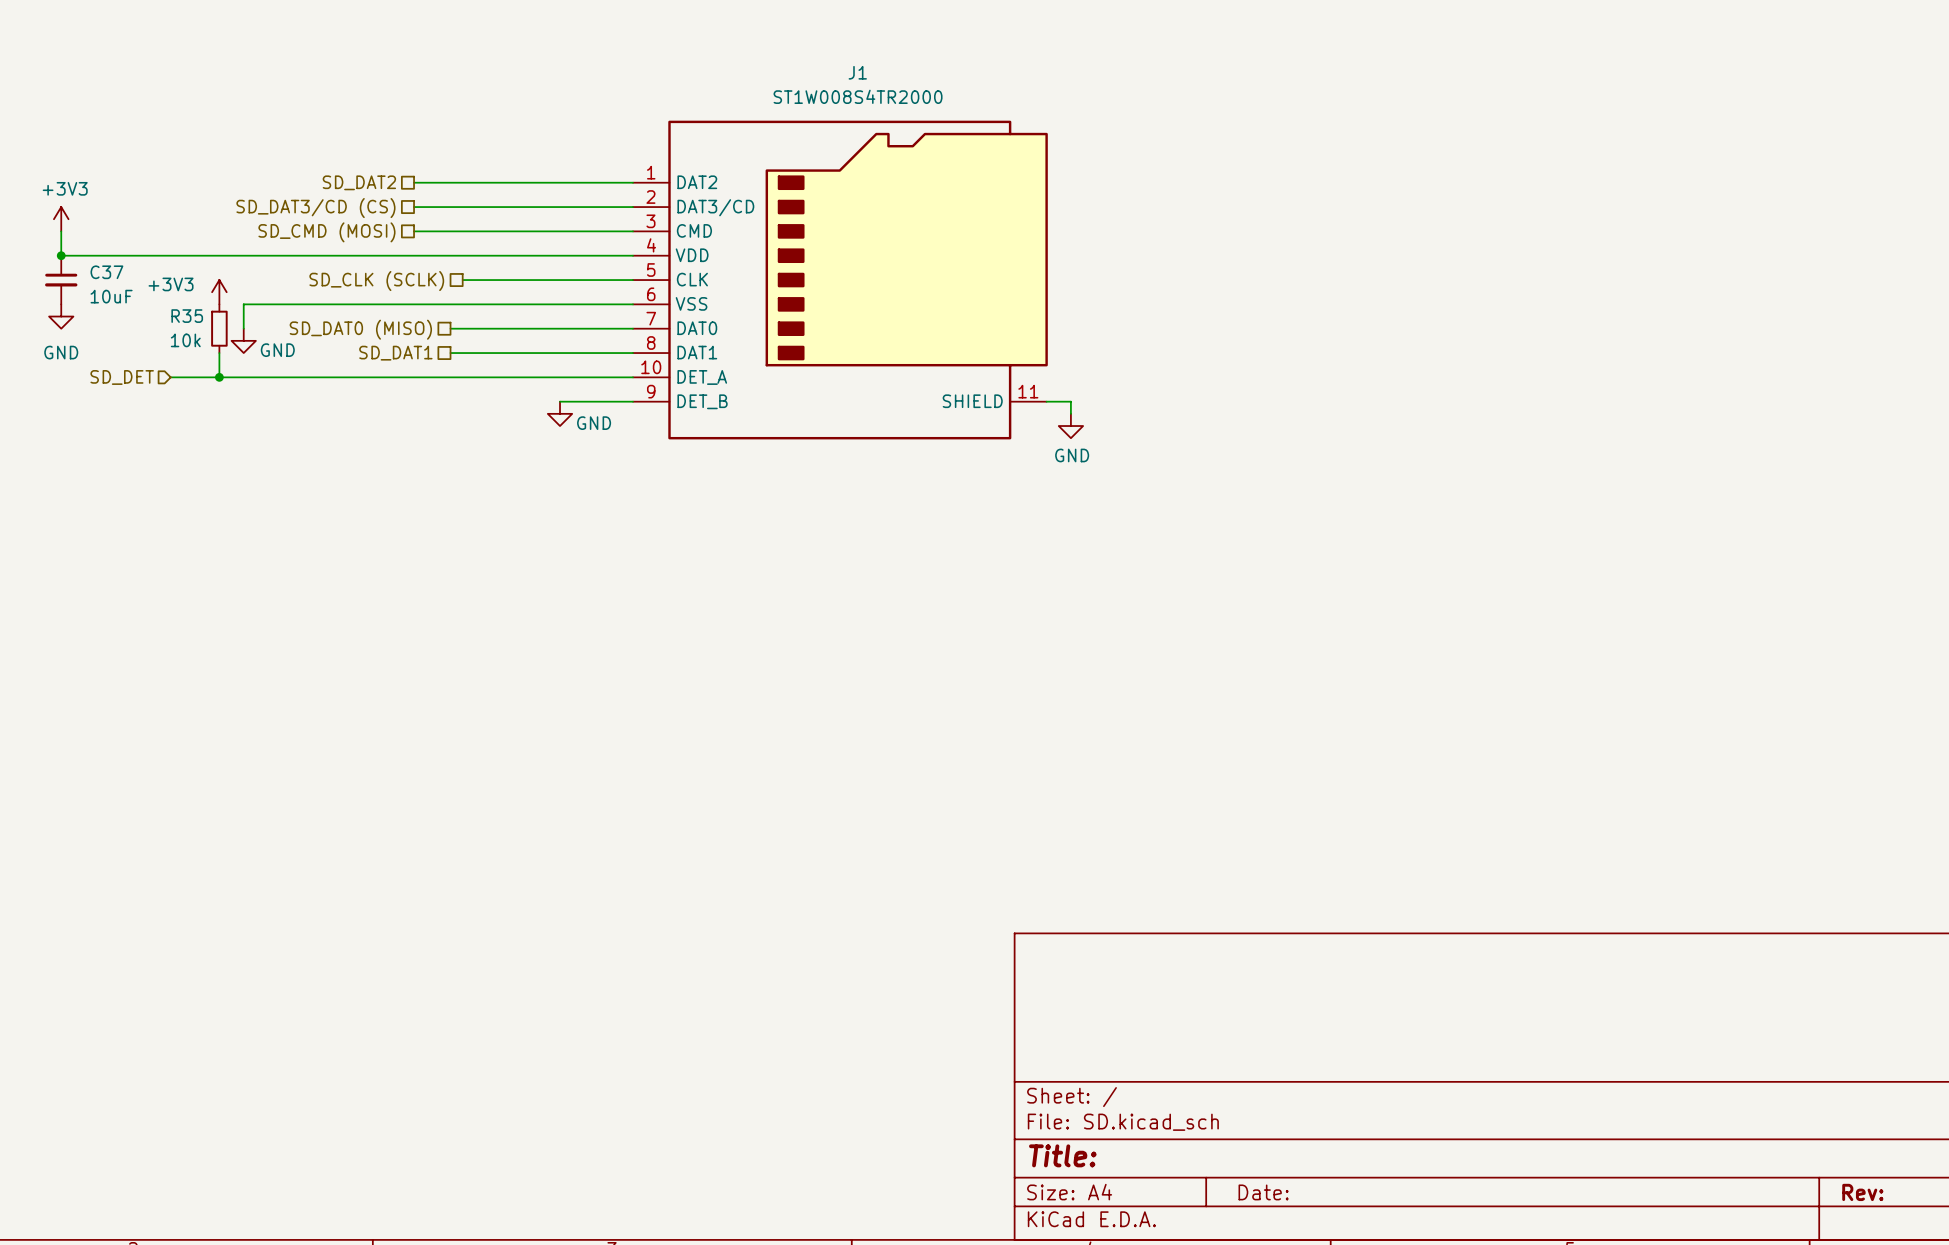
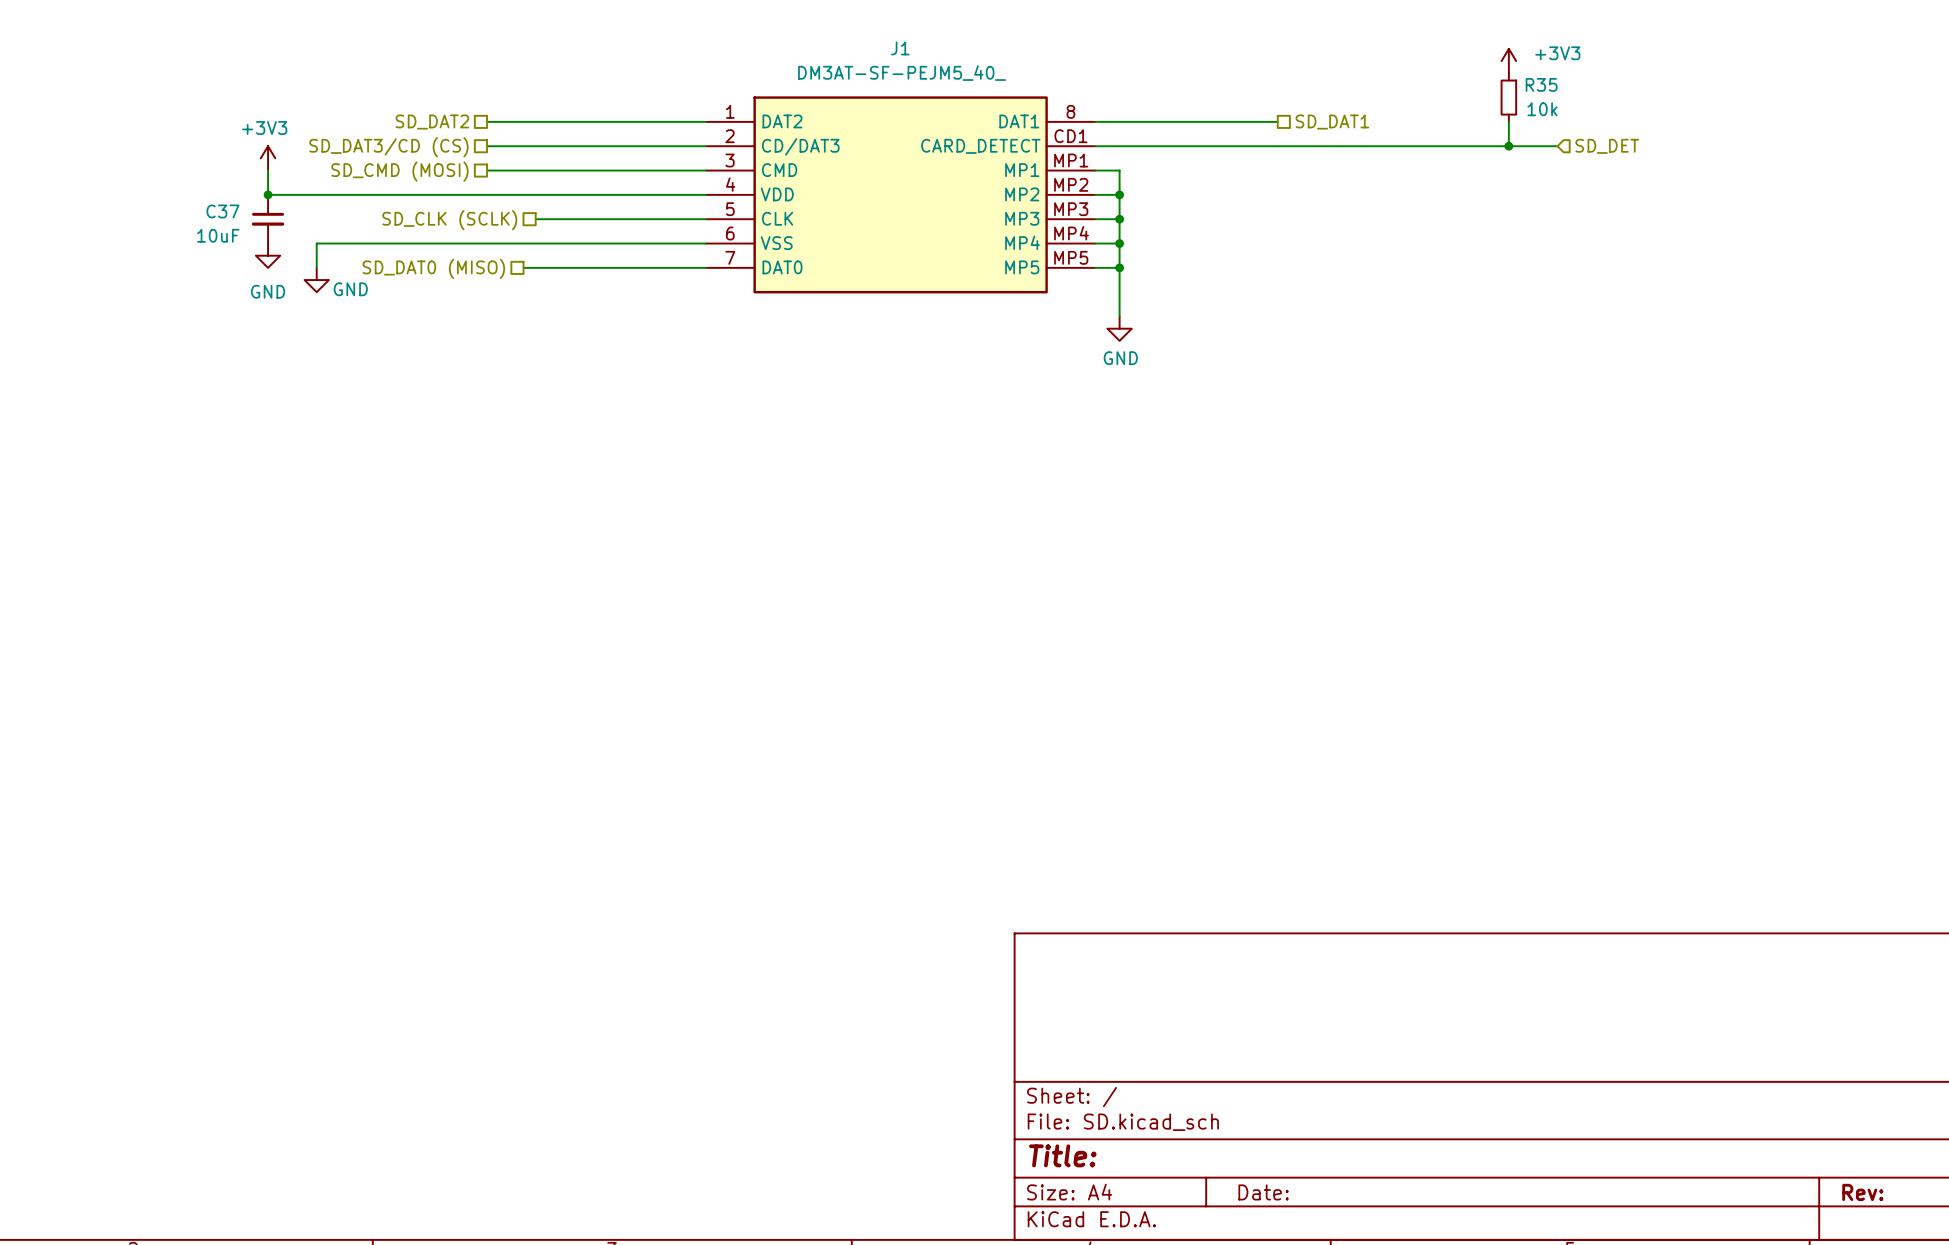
power symbol: none -> +3V3 (1508, 61)
J1 name position: J1 (857, 72) -> J1 (900, 48)
J1 value: ST1W008S4TR2000 (858, 96) -> DM3AT-SF-PEJM5_40_ (902, 73)
J1 symbol: [633, 120, 1048, 440] -> [705, 96, 1096, 294]
wire: none -> (1095, 121) (1277, 121)
wire: none -> (1508, 121) (1508, 146)
hierarchical label: none -> SD_DAT1 (1332, 122)
wire: none -> (1095, 146) (1557, 146)
junction: none -> (1508, 146)
hierarchical label: none -> SD_DET (1607, 146)
power symbol: none -> +3V3 (268, 158)
wire: none -> (268, 170) (268, 194) (705, 194)
wire: none -> (1095, 170) (1119, 170) (1119, 316)
hierarchical label position: SD_DAT2 (359, 182) -> SD_DAT2 (432, 122)
wire: (414, 182) (633, 182) -> (487, 121) (705, 121)
junction: none -> (268, 194)
wire: none -> (1095, 194) (1119, 194)
junction: none -> (1119, 194)
wire: (414, 207) (633, 207) -> (487, 146) (705, 146)
hierarchical label position: SD_DAT3/CD (CS) (315, 208) -> SD_DAT3/CD (CS) (388, 147)
power symbol: +3V3 (61, 219) -> none
wire: none -> (1095, 219) (1119, 219)
junction: none -> (1119, 219)
wire: (61, 231) (61, 255) (633, 255) -> none
wire: (414, 231) (633, 231) -> (487, 170) (705, 170)
hierarchical label position: SD_CMD (MOSI) (326, 232) -> SD_CMD (MOSI) (399, 171)
wire: none -> (1095, 243) (1119, 243)
junction: none -> (1119, 243)
junction: (61, 255) -> none
power symbol: none -> GND (268, 255)
wire: none -> (1095, 267) (1119, 267)
junction: none -> (1119, 267)
C37 name position: C37 (106, 272) -> C37 (222, 211)
C37 position: (61, 280) -> (268, 219)
power symbol: none -> GND (316, 280)
wire: (462, 280) (633, 280) -> (535, 219) (705, 219)
hierarchical label position: SD_CLK (SCLK) (376, 281) -> SD_CLK (SCLK) (449, 220)
power symbol: +3V3 (219, 292) -> none
C37 value position: 10uF (111, 296) -> 10uF (218, 235)
wire: (633, 304) (243, 304) (243, 328) -> (705, 243) (316, 243) (316, 267)
power symbol: GND (61, 316) -> none
R35 name position: R35 (187, 316) -> R35 (1541, 84)
R35 position: (219, 328) -> (1508, 97)
wire: (450, 328) (633, 328) -> (523, 267) (705, 267)
hierarchical label position: SD_DAT0 (MISO) (360, 329) -> SD_DAT0 (MISO) (433, 268)
R35 value position: 10k (185, 340) -> 10k (1542, 109)
power symbol: GND (243, 340) -> none
wire: (219, 353) (219, 377) -> none
hierarchical label: SD_DAT1 (395, 353) -> none
wire: (450, 353) (633, 353) -> none
hierarchical label: SD_DET (122, 377) -> none
wire: (170, 377) (633, 377) -> none
junction: (219, 377) -> none
wire: (560, 401) (633, 401) -> none
wire: (1046, 401) (1070, 401) (1070, 413) -> none
power symbol: GND (560, 413) -> none
power symbol position: GND (1070, 426) -> GND (1119, 328)

